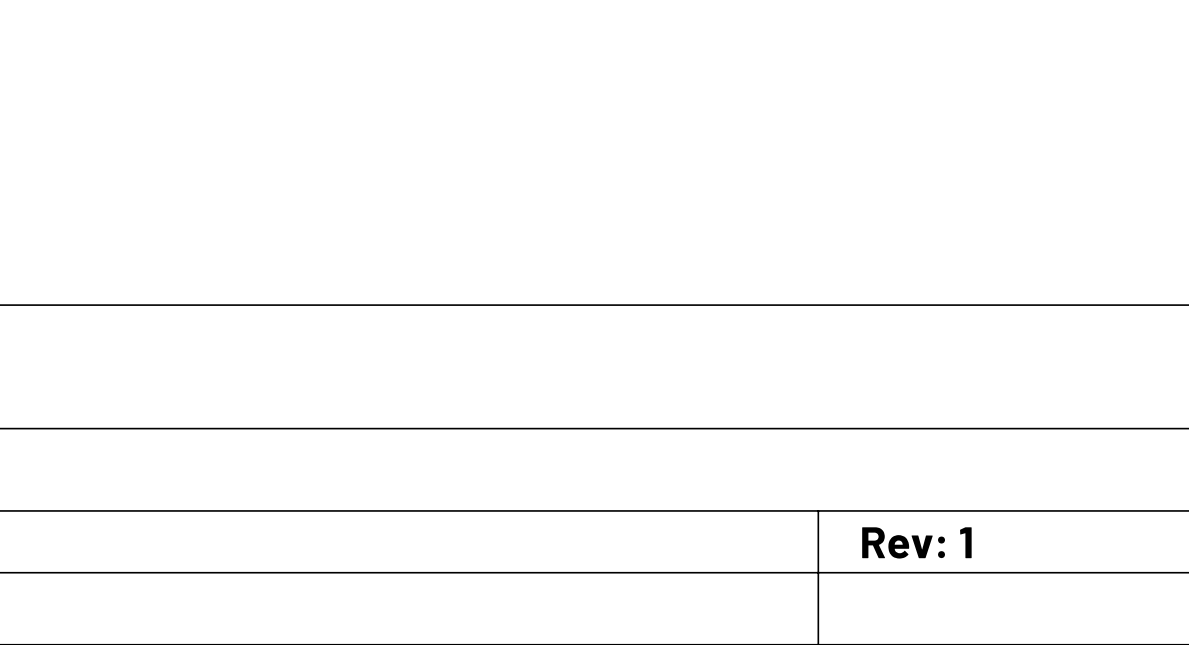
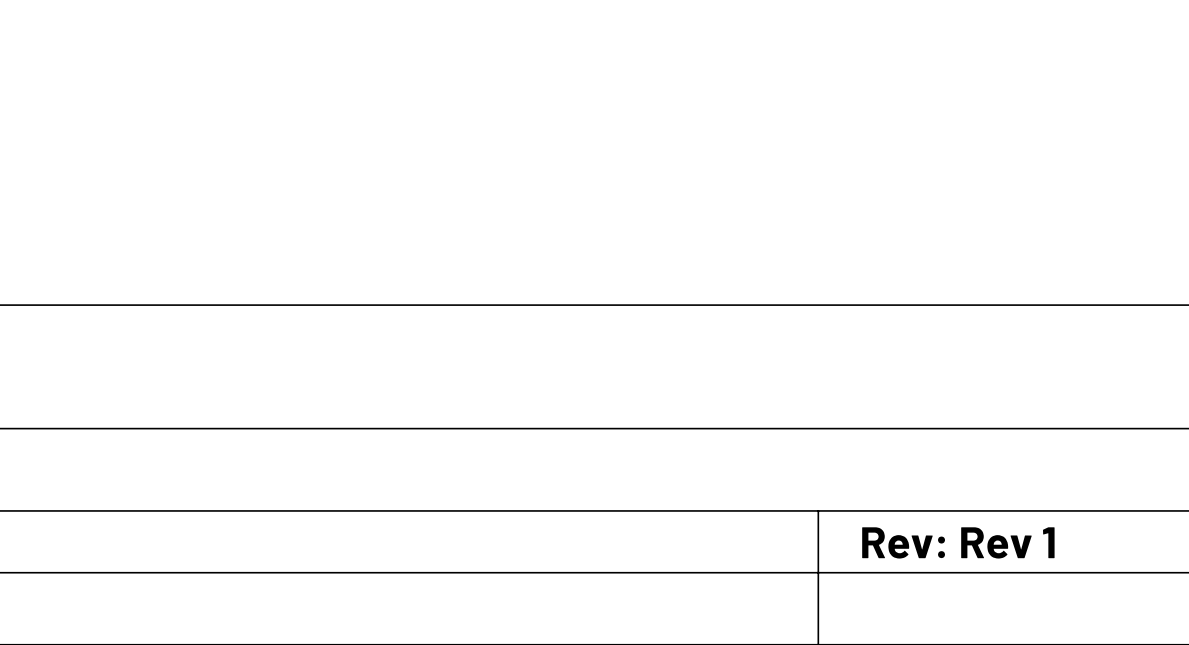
title block: Rev: 1 (916, 542) -> Rev: Rev 1 (958, 542)

